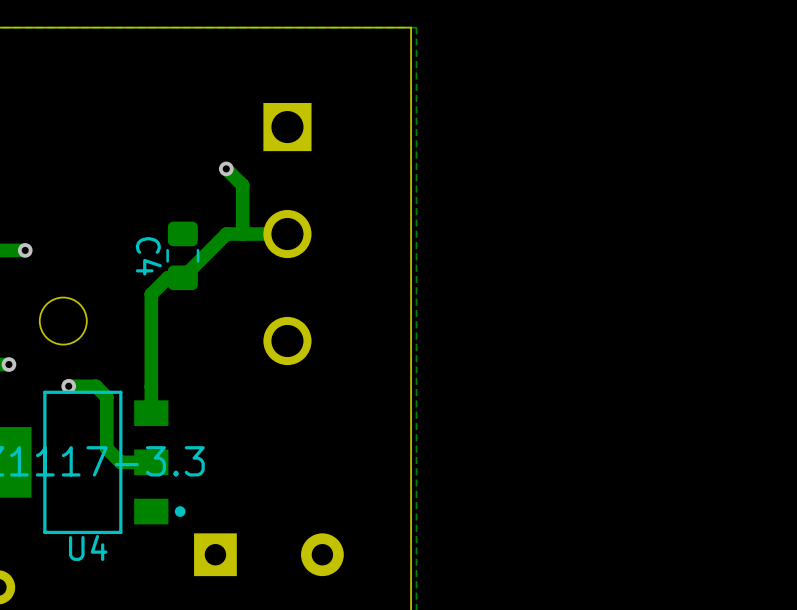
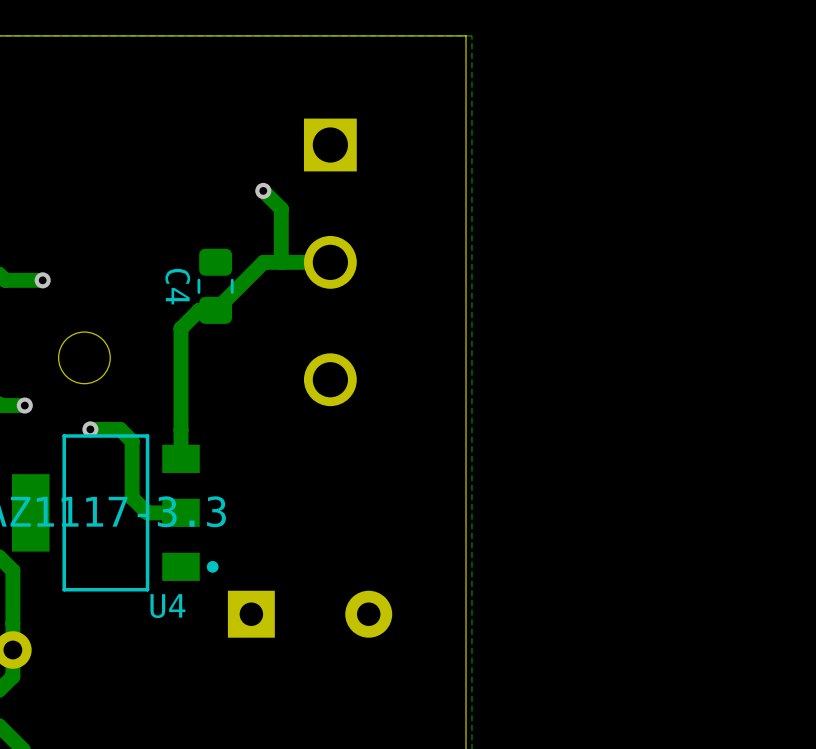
U4 name position: U4 (88, 547) -> U4 (167, 606)

